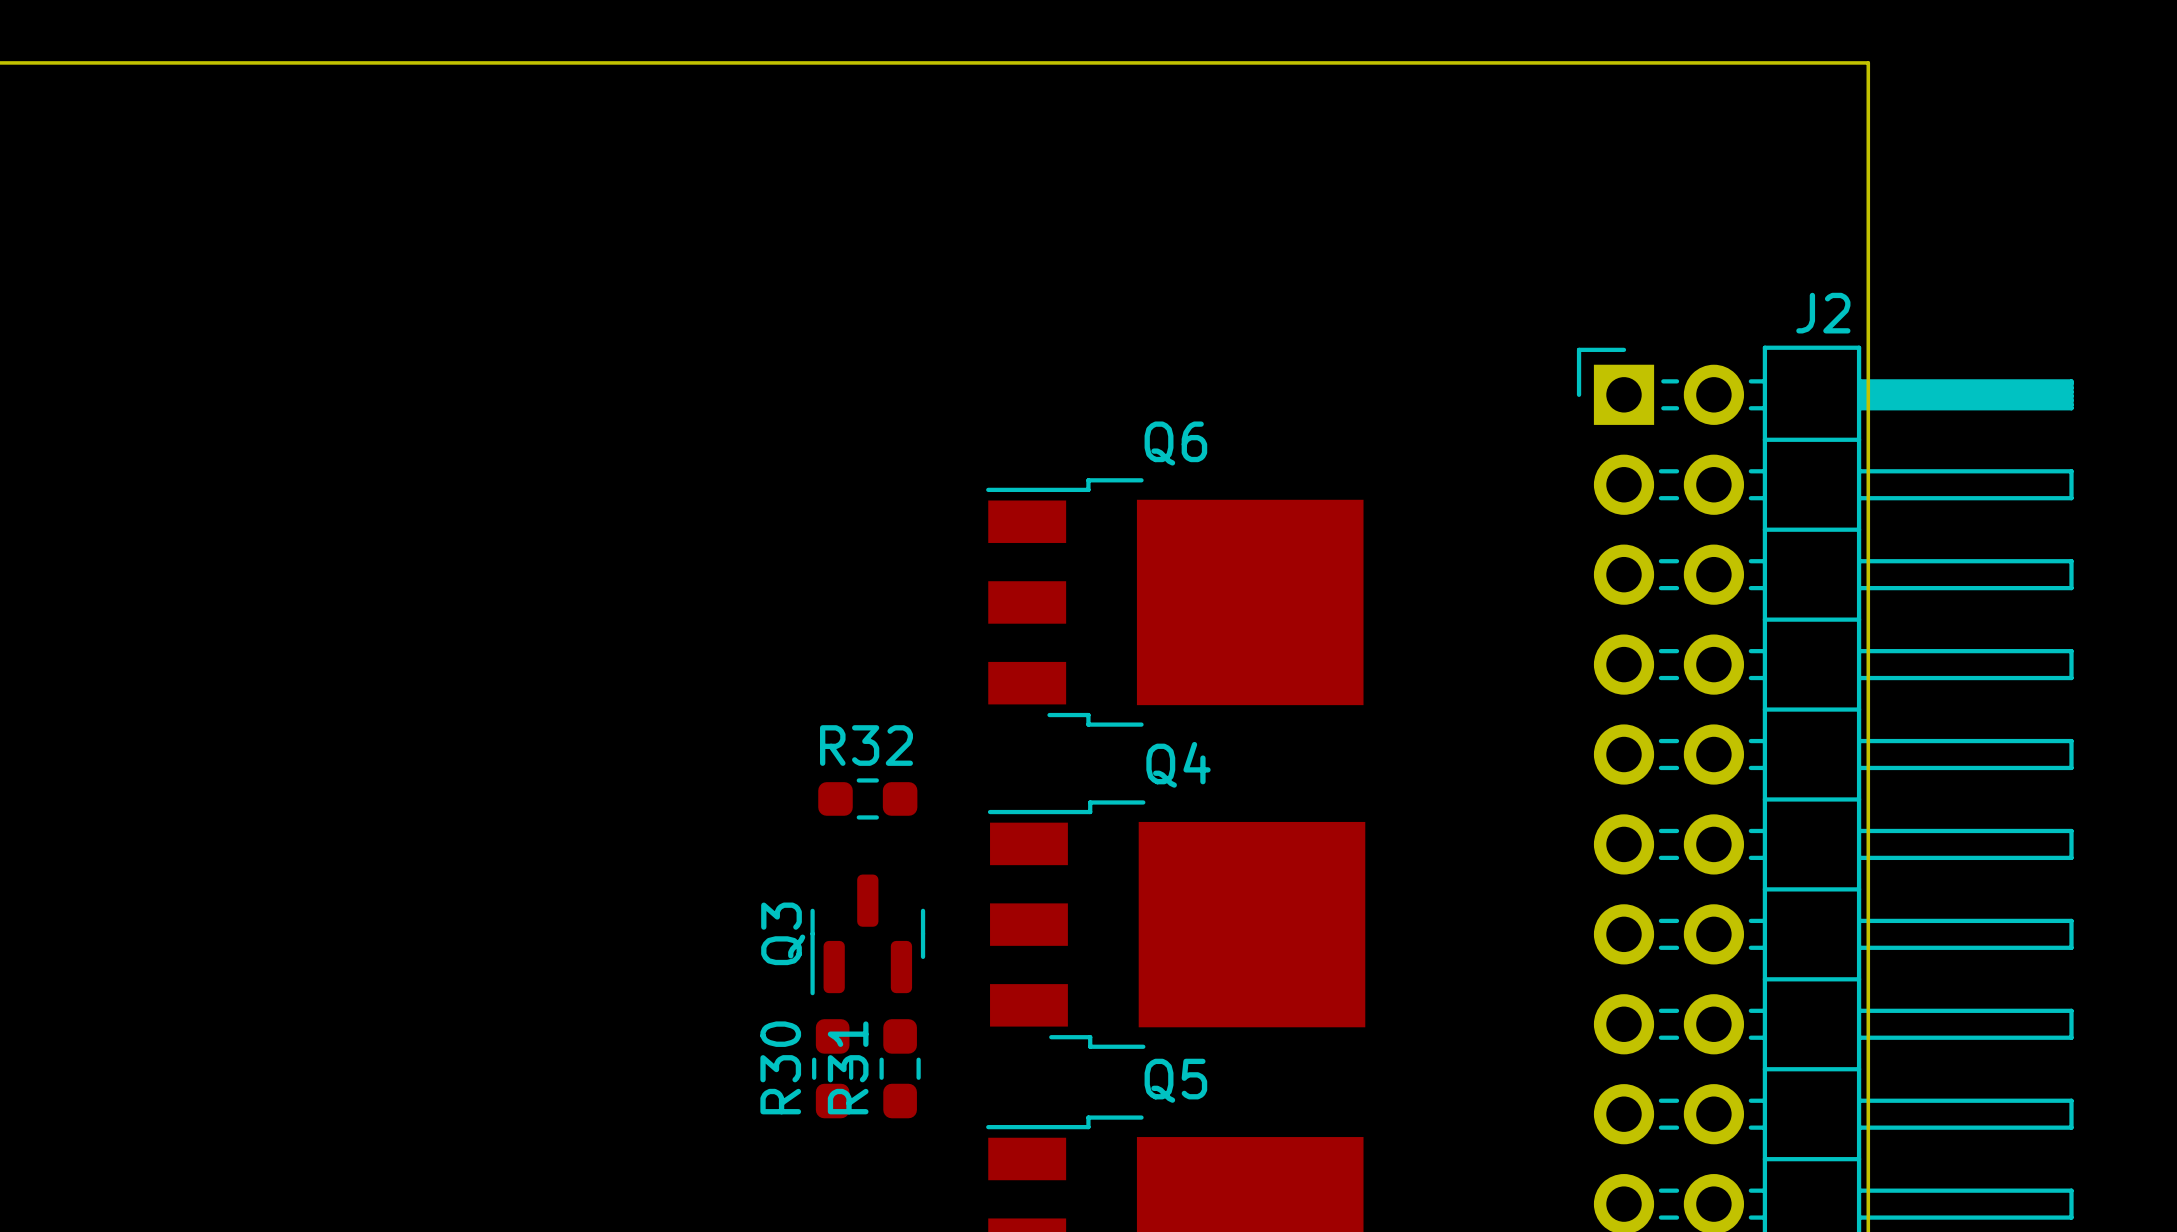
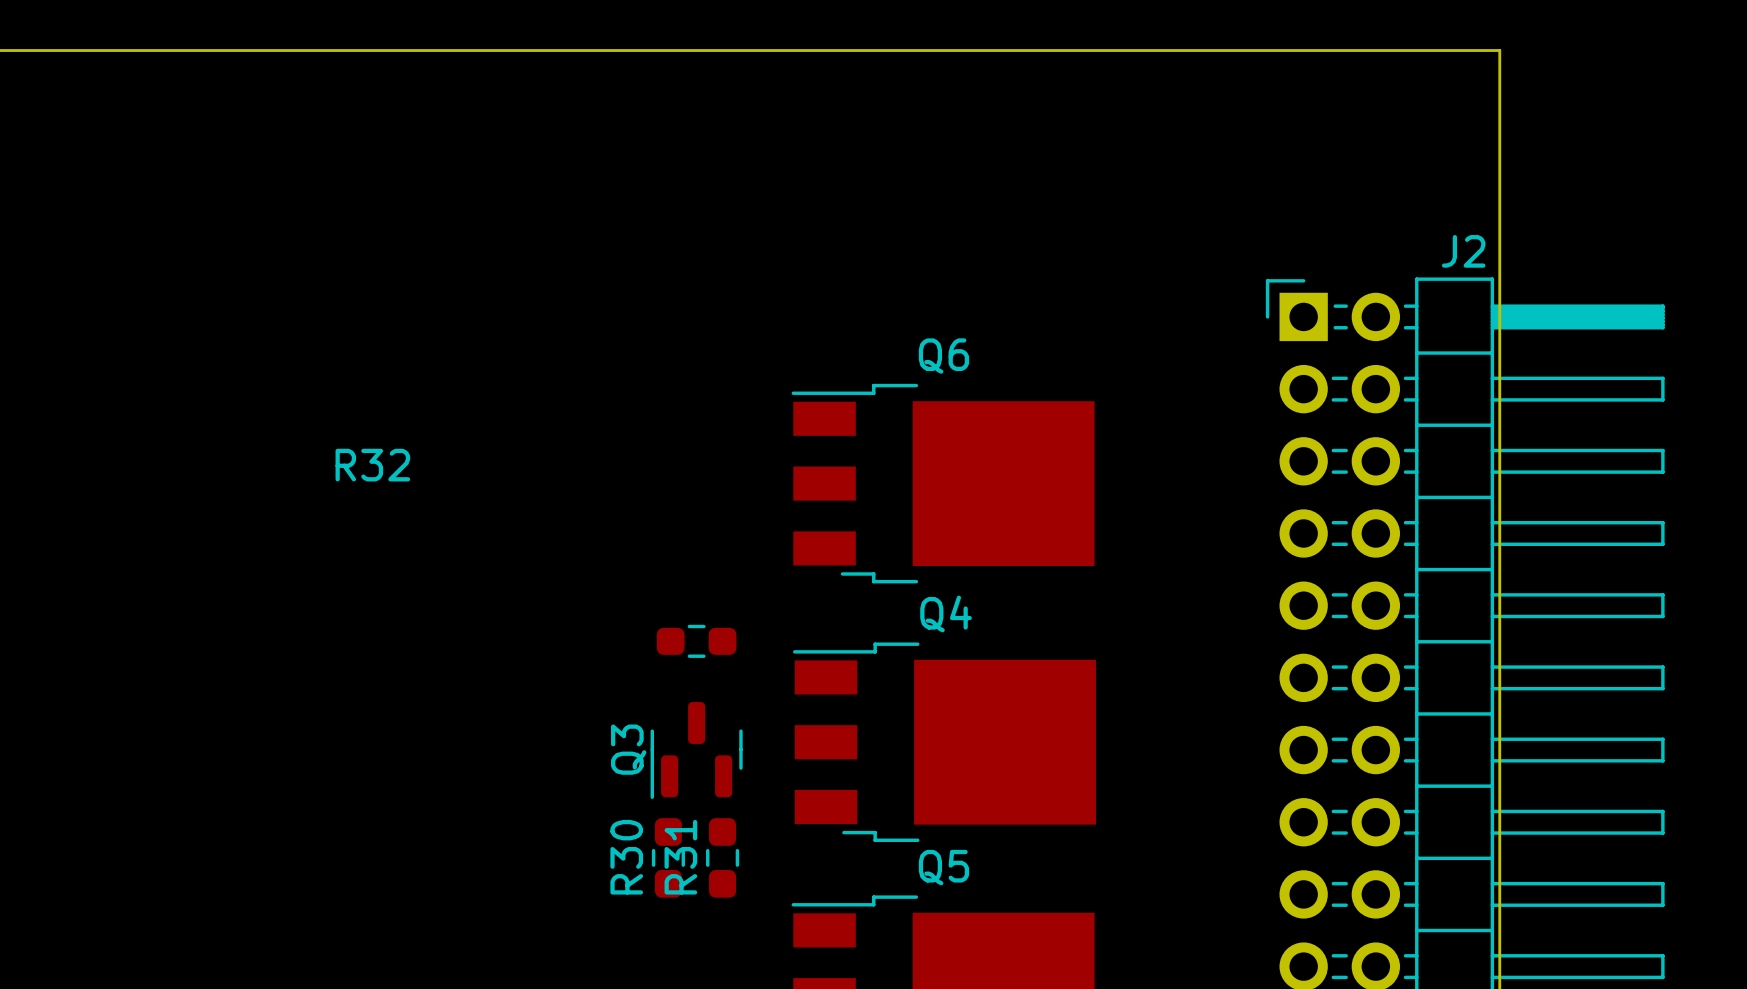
R32 name position: R32 (866, 745) -> R32 (372, 465)

